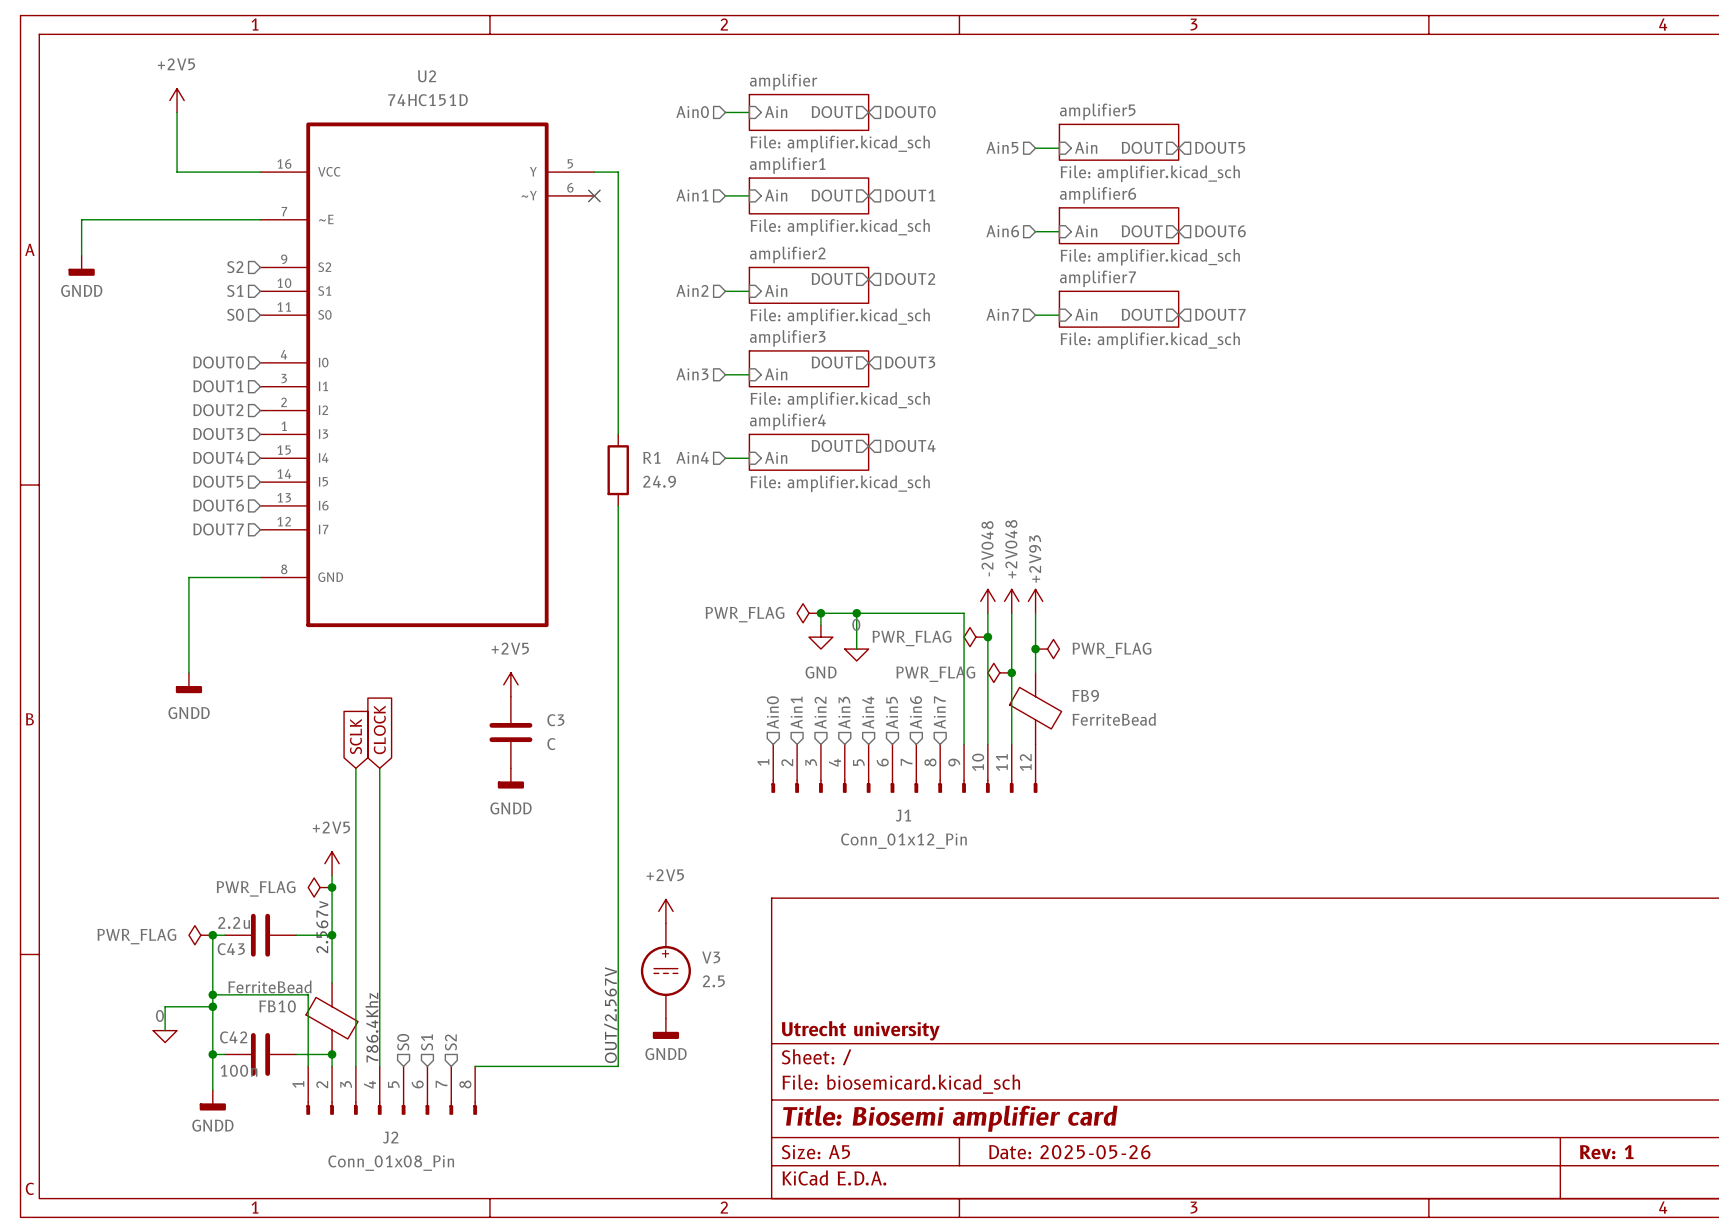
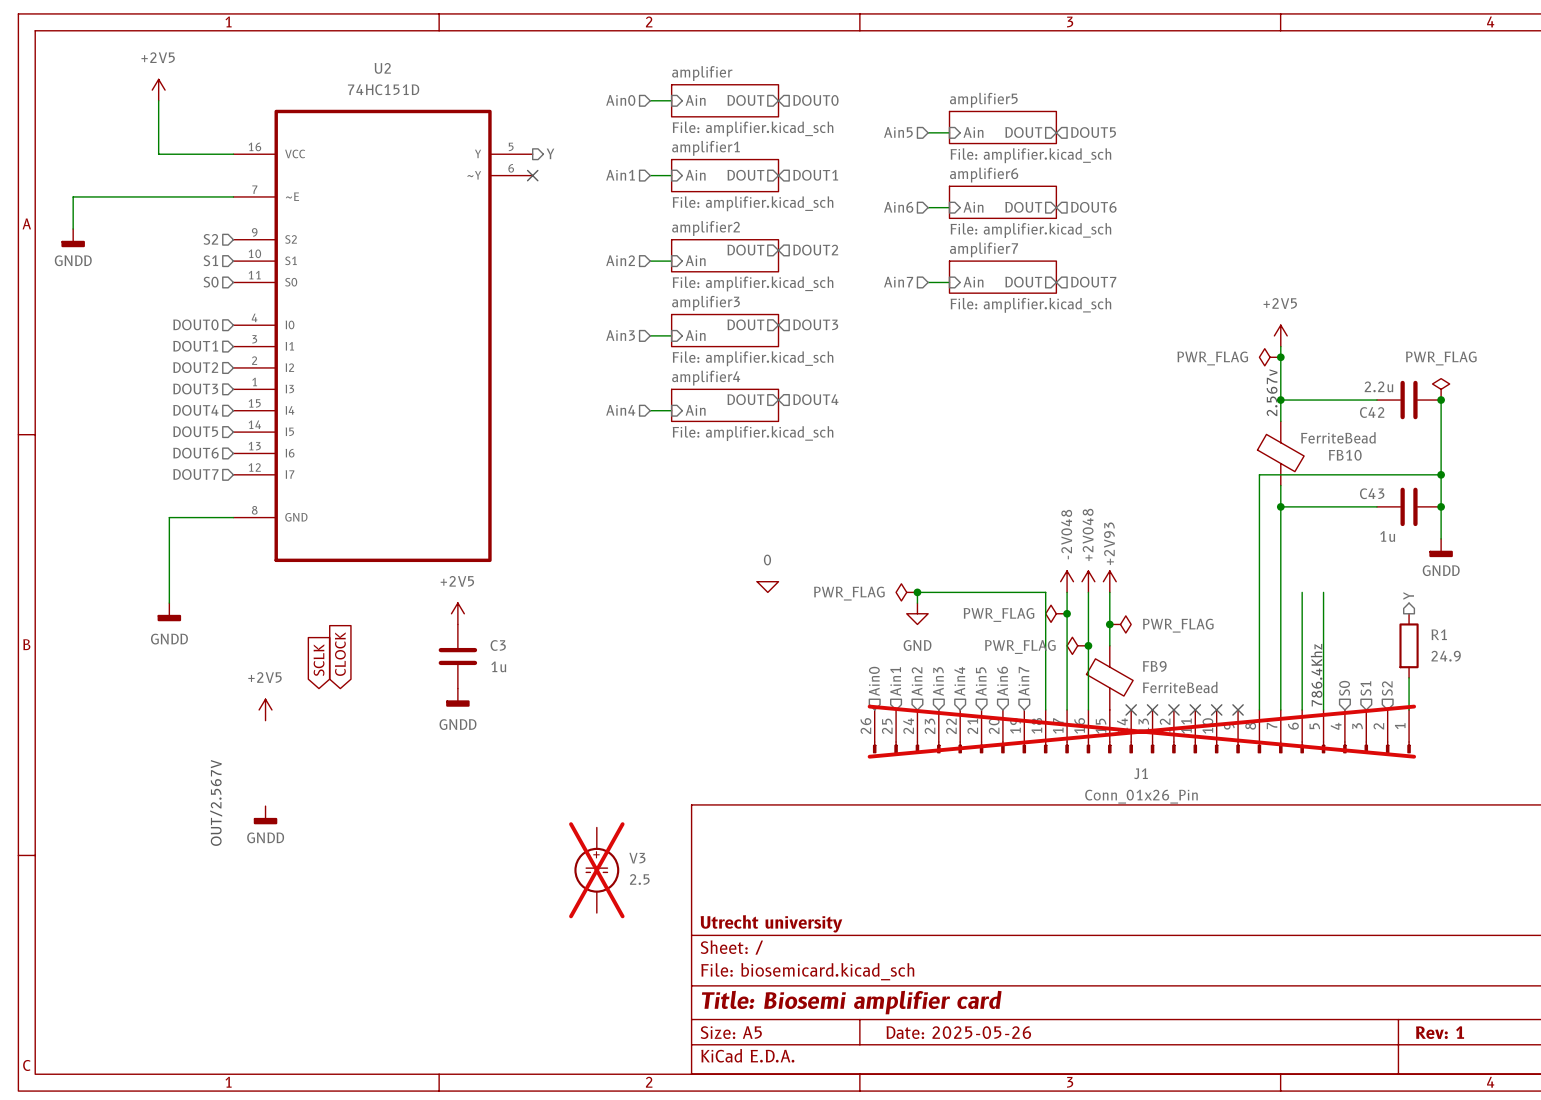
hierarchical label: none -> Y (550, 153)
wire: (594, 172) (618, 172) (618, 434) -> none
power symbol: none -> +2V5 (1280, 335)
wire: none -> (1280, 346) (1280, 421)
power symbol: none -> PWR_FLAG (1270, 357)
junction: none -> (1280, 357)
power symbol: none -> PWR_FLAG (1441, 389)
text: none -> 2.567v (1272, 392)
wire: none -> (1280, 400) (1376, 400)
junction: none -> (1280, 400)
wire: none -> (1441, 400) (1441, 538)
junction: none -> (1441, 400)
R1 position: (618, 470) -> (1409, 645)
wire: (618, 505) (618, 1066) (475, 1066) -> none
wire: none -> (1441, 474) (1259, 474) (1259, 709)
junction: none -> (1441, 474)
wire: none -> (1280, 485) (1280, 709)
wire: none -> (1280, 506) (1376, 506)
junction: none -> (1280, 506)
junction: none -> (1441, 506)
power symbol position: -2V048 (987, 601) -> -2V048 (1067, 581)
power symbol position: +2V048 (1011, 601) -> +2V048 (1088, 581)
power symbol position: +2V93 (1035, 601) -> +2V93 (1109, 581)
power symbol: none -> GNDD (1441, 548)
power symbol: PWR_FLAG (809, 613) -> none
junction: (820, 613) -> none
wire: (856, 613) (856, 649) -> none
junction: (856, 613) -> none
wire: (987, 613) (987, 744) -> (1067, 592) (1067, 709)
wire: (1011, 613) (1011, 744) -> (1088, 592) (1088, 709)
wire: (1035, 613) (1035, 672) -> (1109, 592) (1109, 645)
wire: (820, 625) (820, 613) (964, 613) (964, 744) -> (917, 603) (917, 592) (1045, 592) (1045, 709)
power symbol position: GND (820, 637) -> GND (917, 613)
power symbol: PWR_FLAG (975, 637) -> none
junction: (987, 637) -> none
junction: (1035, 649) -> none
power symbol: PWR_FLAG (1047, 649) -> none
junction: none -> (917, 592)
wire: none -> (1302, 592) (1302, 709)
wire: none -> (1323, 592) (1323, 709)
hierarchical label: none -> Y (1408, 595)
power symbol position: PWR_FLAG (999, 672) -> PWR_FLAG (906, 592)
junction: (1011, 672) -> none
power symbol: none -> PWR_FLAG (1056, 613)
junction: none -> (1067, 613)
junction: none -> (1109, 624)
power symbol: none -> PWR_FLAG (1120, 624)
FB9 position: (1035, 708) -> (1109, 677)
hierarchical label position: Ain0 (772, 712) -> Ain0 (874, 681)
hierarchical label position: Ain1 (796, 712) -> Ain1 (895, 681)
hierarchical label position: Ain2 (820, 712) -> Ain2 (917, 681)
hierarchical label position: Ain3 (844, 712) -> Ain3 (938, 681)
hierarchical label position: Ain4 (868, 712) -> Ain4 (959, 681)
hierarchical label position: Ain5 (892, 712) -> Ain5 (981, 681)
hierarchical label position: Ain6 (915, 712) -> Ain6 (1002, 681)
hierarchical label position: Ain7 (939, 712) -> Ain7 (1023, 681)
power symbol: none -> PWR_FLAG (1077, 645)
junction: none -> (1088, 645)
C3 value: C (551, 744) -> 1u (498, 666)
J1 symbol: [771, 744, 1038, 793] -> [872, 709, 1411, 754]
text: none -> 786.4Khz (1316, 675)
wire: none -> (1409, 677) (1409, 709)
wire: (355, 768) (355, 1066) -> none
wire: (379, 768) (379, 1066) -> none
hierarchical label: none -> S0 (1344, 688)
hierarchical label: none -> S1 (1365, 688)
hierarchical label: none -> S2 (1387, 688)
no-connect mark: none -> (1131, 709)
no-connect mark: none -> (1152, 709)
no-connect mark: none -> (1173, 709)
no-connect mark: none -> (1195, 709)
no-connect mark: none -> (1216, 709)
no-connect mark: none -> (1238, 709)
J1 do-not-place cross: none -> (1141, 731)
J1 value: Conn_01x12_Pin (903, 841) -> Conn_01x26_Pin (1141, 796)
power symbol position: +2V5 (332, 863) -> +2V5 (265, 709)
wire: (332, 875) (332, 982) -> none
power symbol: PWR_FLAG (320, 887) -> none
junction: (332, 887) -> none
text: none -> OUT/2.567V (216, 802)
power symbol: none -> GNDD (265, 815)
power symbol: +2V5 (665, 911) -> none
C43 value: 2.2u (234, 922) -> 1u (1387, 536)
text: 2.567v (322, 927) -> none
power symbol: PWR_FLAG (200, 935) -> none
junction: (212, 935) -> none
wire: (224, 935) (212, 935) (212, 1090) -> none
C43 position: (260, 935) -> (1409, 506)
wire: (296, 935) (332, 935) -> none
junction: (332, 935) -> none
C43 name position: C43 (231, 949) -> C43 (1372, 493)
V3 do-not-place cross: none -> (596, 870)
FB10 value position: FerriteBead (269, 986) -> FerriteBead (1338, 437)
wire: (212, 994) (308, 994) (308, 1066) -> none
junction: (212, 994) -> none
wire: (212, 1006) (165, 1006) (165, 1030) -> none
junction: (212, 1006) -> none
FB10 name position: FB10 (277, 1006) -> FB10 (1345, 455)
text: OUT/2.567V (610, 1015) -> none
FB10 position: (332, 1018) -> (1280, 453)
text: 786.4Khz (371, 1027) -> none
power symbol: GNDD (665, 1028) -> none
power symbol: 0 (165, 1036) -> none
C42 name position: C42 (233, 1037) -> C42 (1372, 412)
hierarchical label: S0 (403, 1042) -> none
hierarchical label: S1 (427, 1042) -> none
hierarchical label: S2 (450, 1042) -> none
wire: (212, 1054) (224, 1054) -> none
junction: (212, 1054) -> none
C42 position: (260, 1054) -> (1409, 400)
wire: (296, 1054) (332, 1054) (332, 1066) -> none
junction: (332, 1054) -> none
C42 value: 100n (239, 1070) -> 2.2u (1378, 386)
J2: Conn_01x08_Pin (391, 1090) -> none
power symbol: GNDD (212, 1100) -> none

